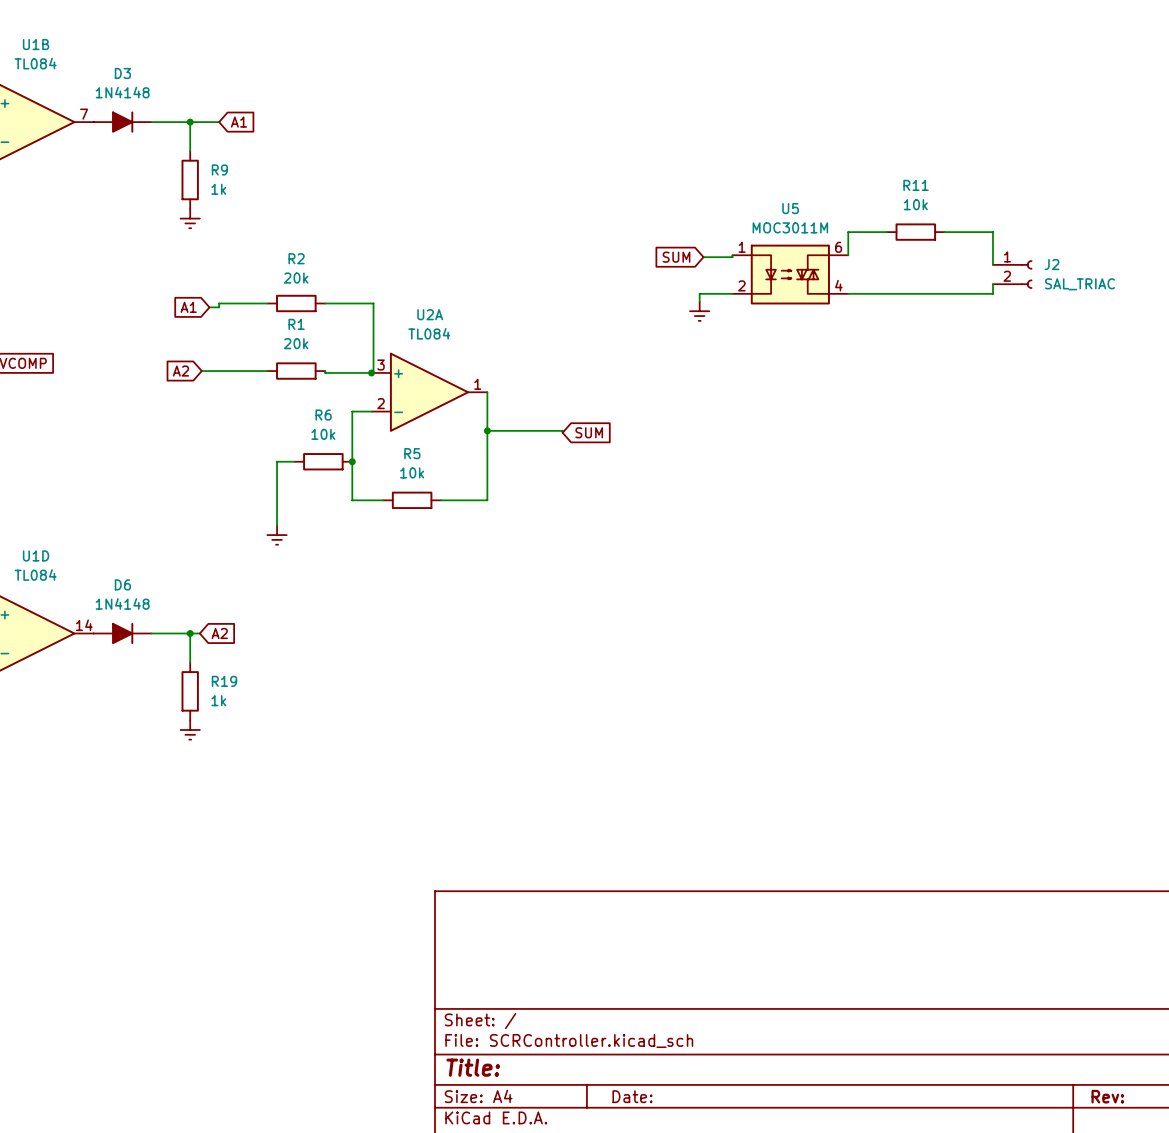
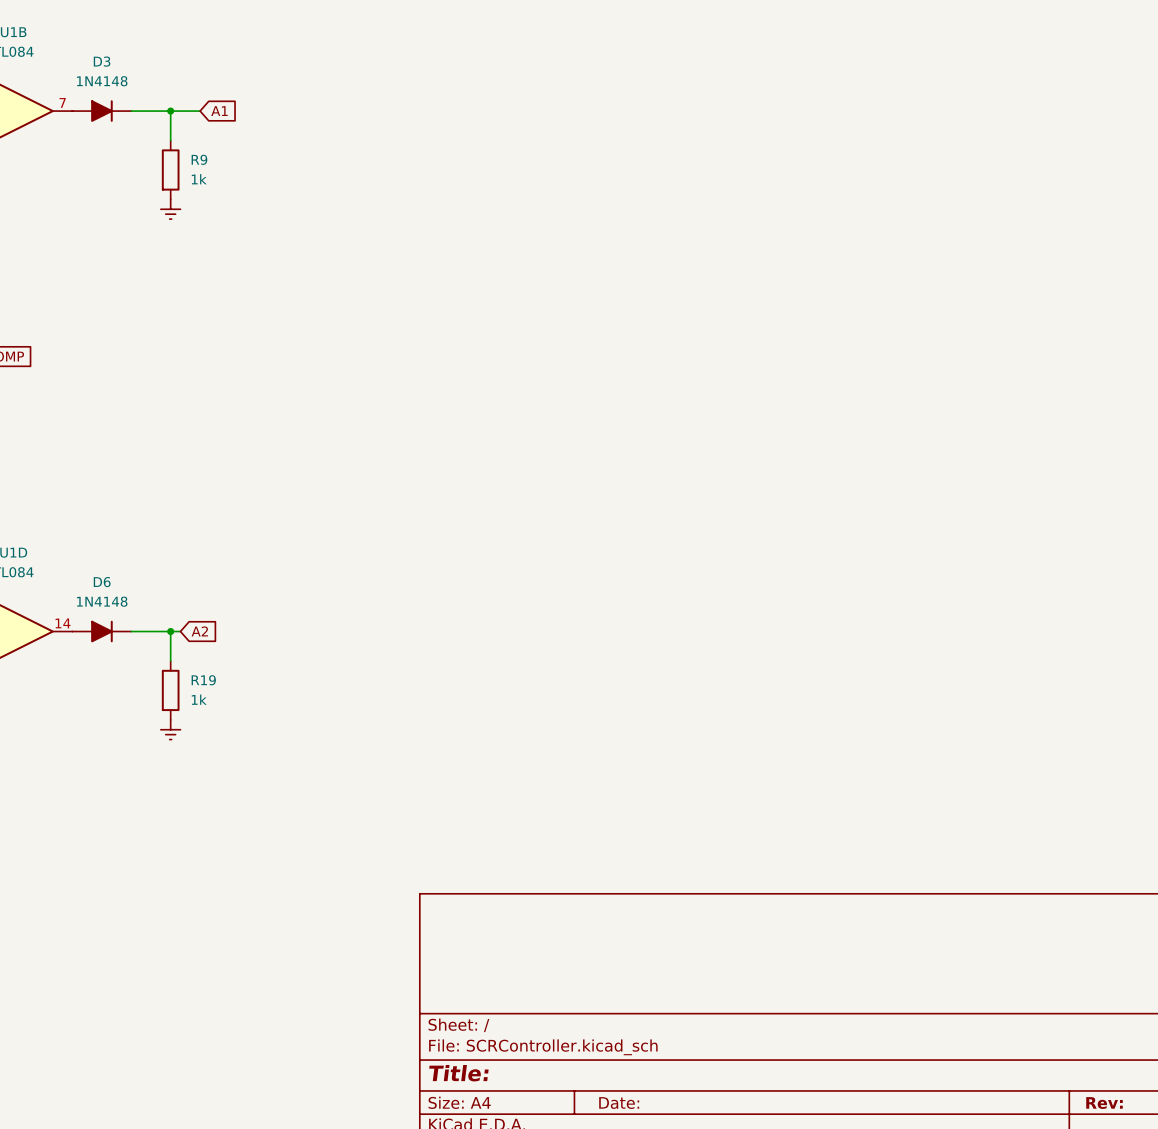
wire: (886, 232) (848, 232) (848, 255) -> none
R11: 10k (915, 232) -> none
wire: (944, 232) (992, 232) (992, 264) -> none
wire: (732, 255) (732, 257) (703, 257) -> none
global label: SUM (676, 257) -> none
U5: MOC3011M (790, 274) -> none
J2: SAL_TRIAC (1012, 274) -> none
wire: (992, 284) (992, 293) (848, 293) -> none
wire: (732, 293) (699, 293) (699, 301) -> none
wire: (267, 303) (219, 303) (219, 307) (209, 307) -> none
R2: 20k (296, 303) -> none
wire: (325, 303) (373, 303) (373, 372) (325, 372) (325, 371) -> none
global label: A1 (188, 307) -> none
power symbol: (699, 311) -> none
global label: A2 (180, 371) -> none
wire: (201, 371) (267, 371) -> none
R1: 20k (296, 371) -> none
junction: (371, 372) -> none
U2A: TL084 (429, 392) -> none
wire: (487, 392) (487, 500) (441, 500) -> none
wire: (371, 411) (352, 411) (352, 500) (383, 500) -> none
wire: (487, 430) (562, 430) (562, 432) -> none
junction: (487, 430) -> none
global label: SUM (589, 432) -> none
wire: (294, 461) (277, 461) (277, 525) -> none
R6: 10k (323, 461) -> none
junction: (352, 461) -> none
R5: 10k (412, 500) -> none
power symbol: (277, 535) -> none

